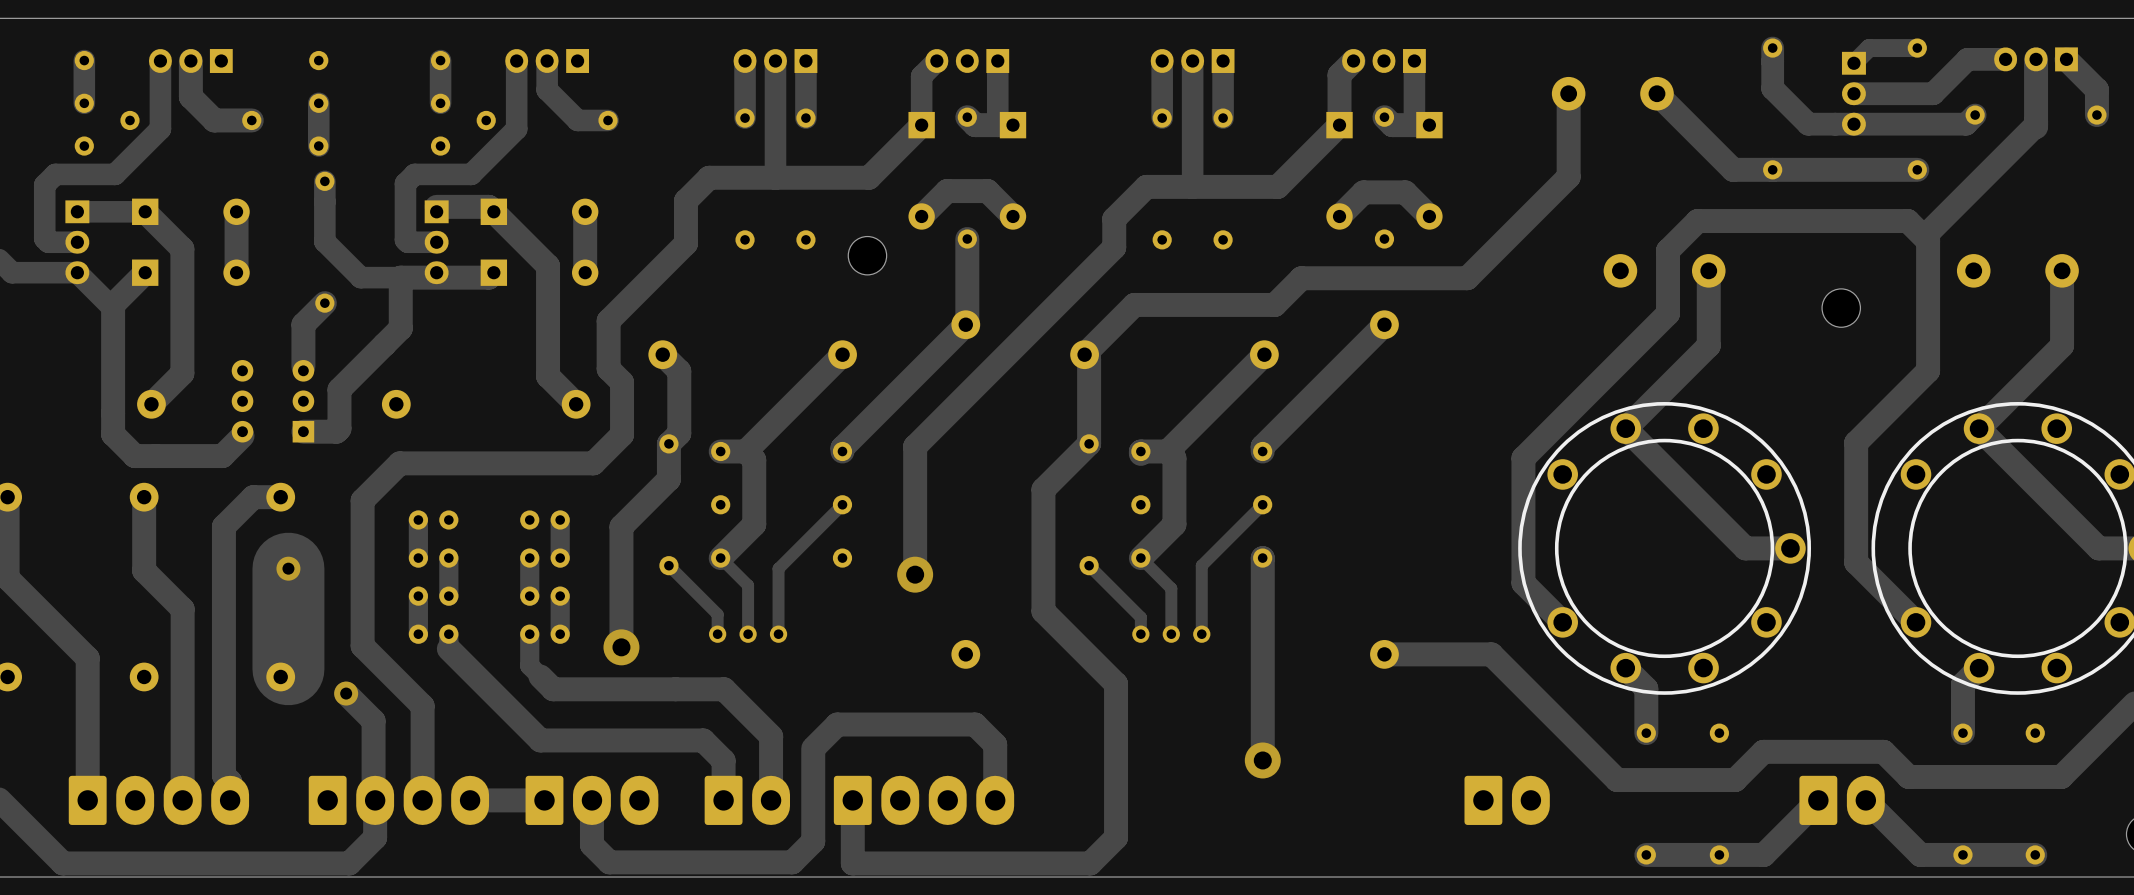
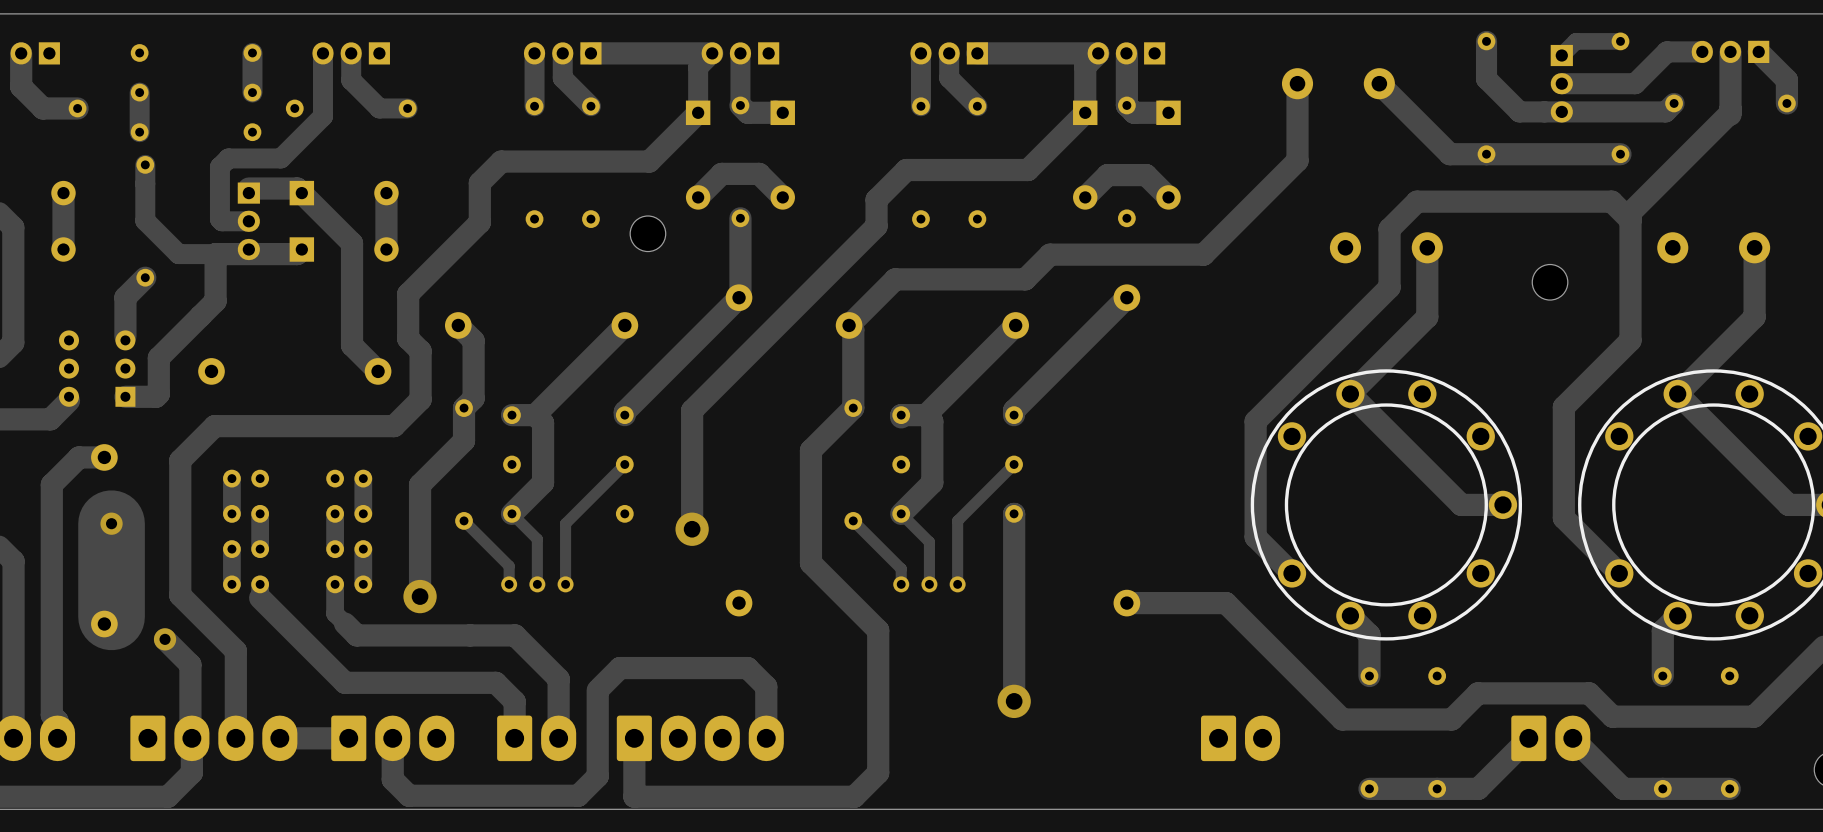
track: (805, 61) (805, 118) -> (562, 78) (590, 106)
track: none -> (712, 53) (590, 53)
track: none -> (740, 53) (740, 105)
track: (997, 61) (997, 125) -> none
track: (1223, 61) (1223, 118) -> (949, 78) (977, 106)
track: none -> (1098, 53) (977, 53)
track: none -> (1126, 53) (1126, 105)
track: (1414, 61) (1414, 125) -> none
track: (775, 87) (775, 177) -> none
track: (1192, 87) (1192, 186) -> none

